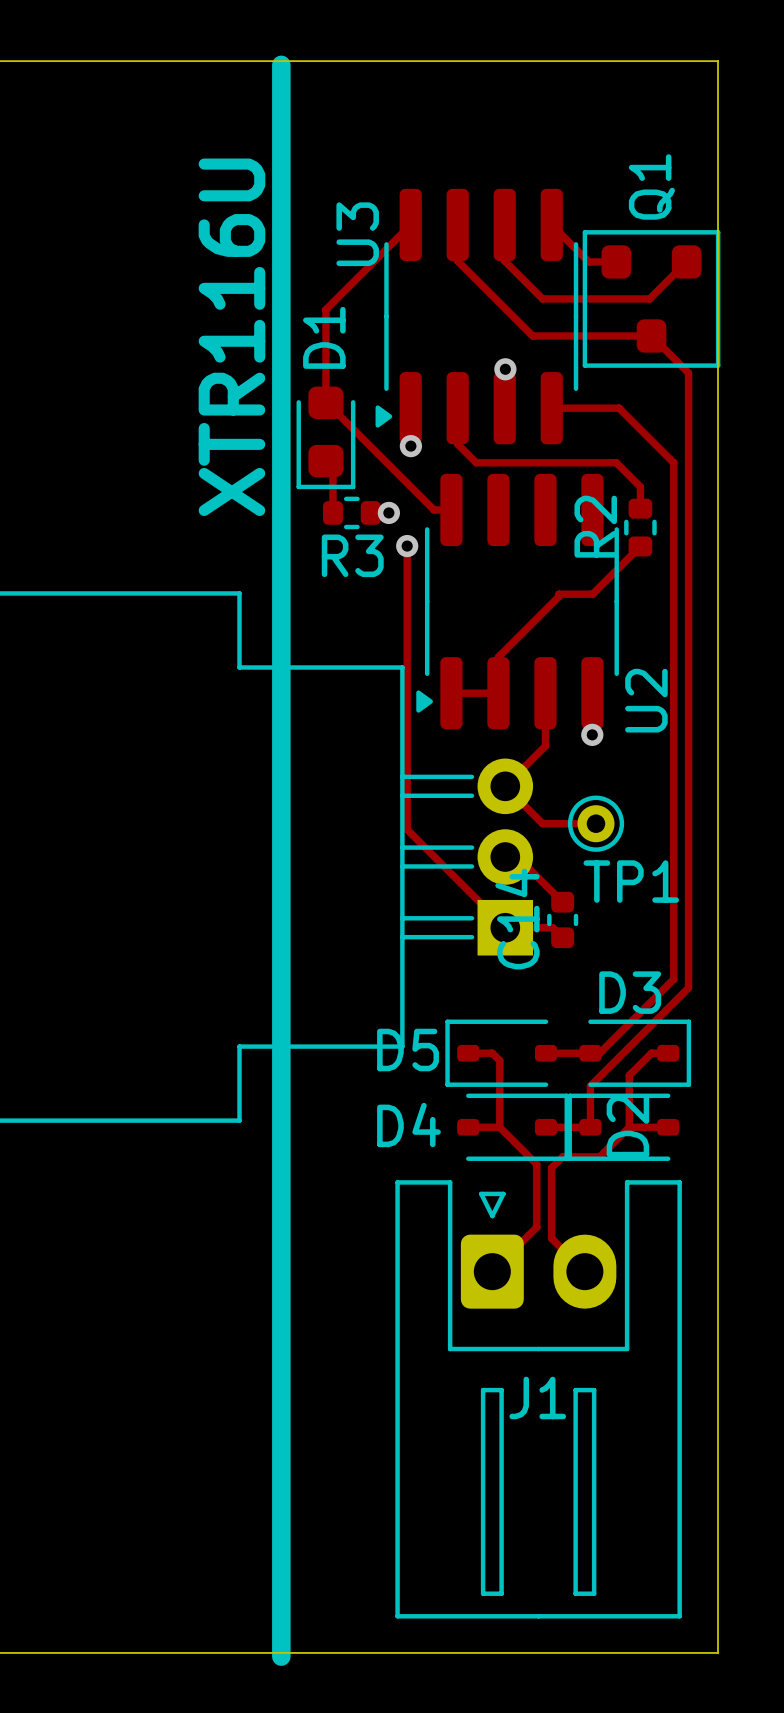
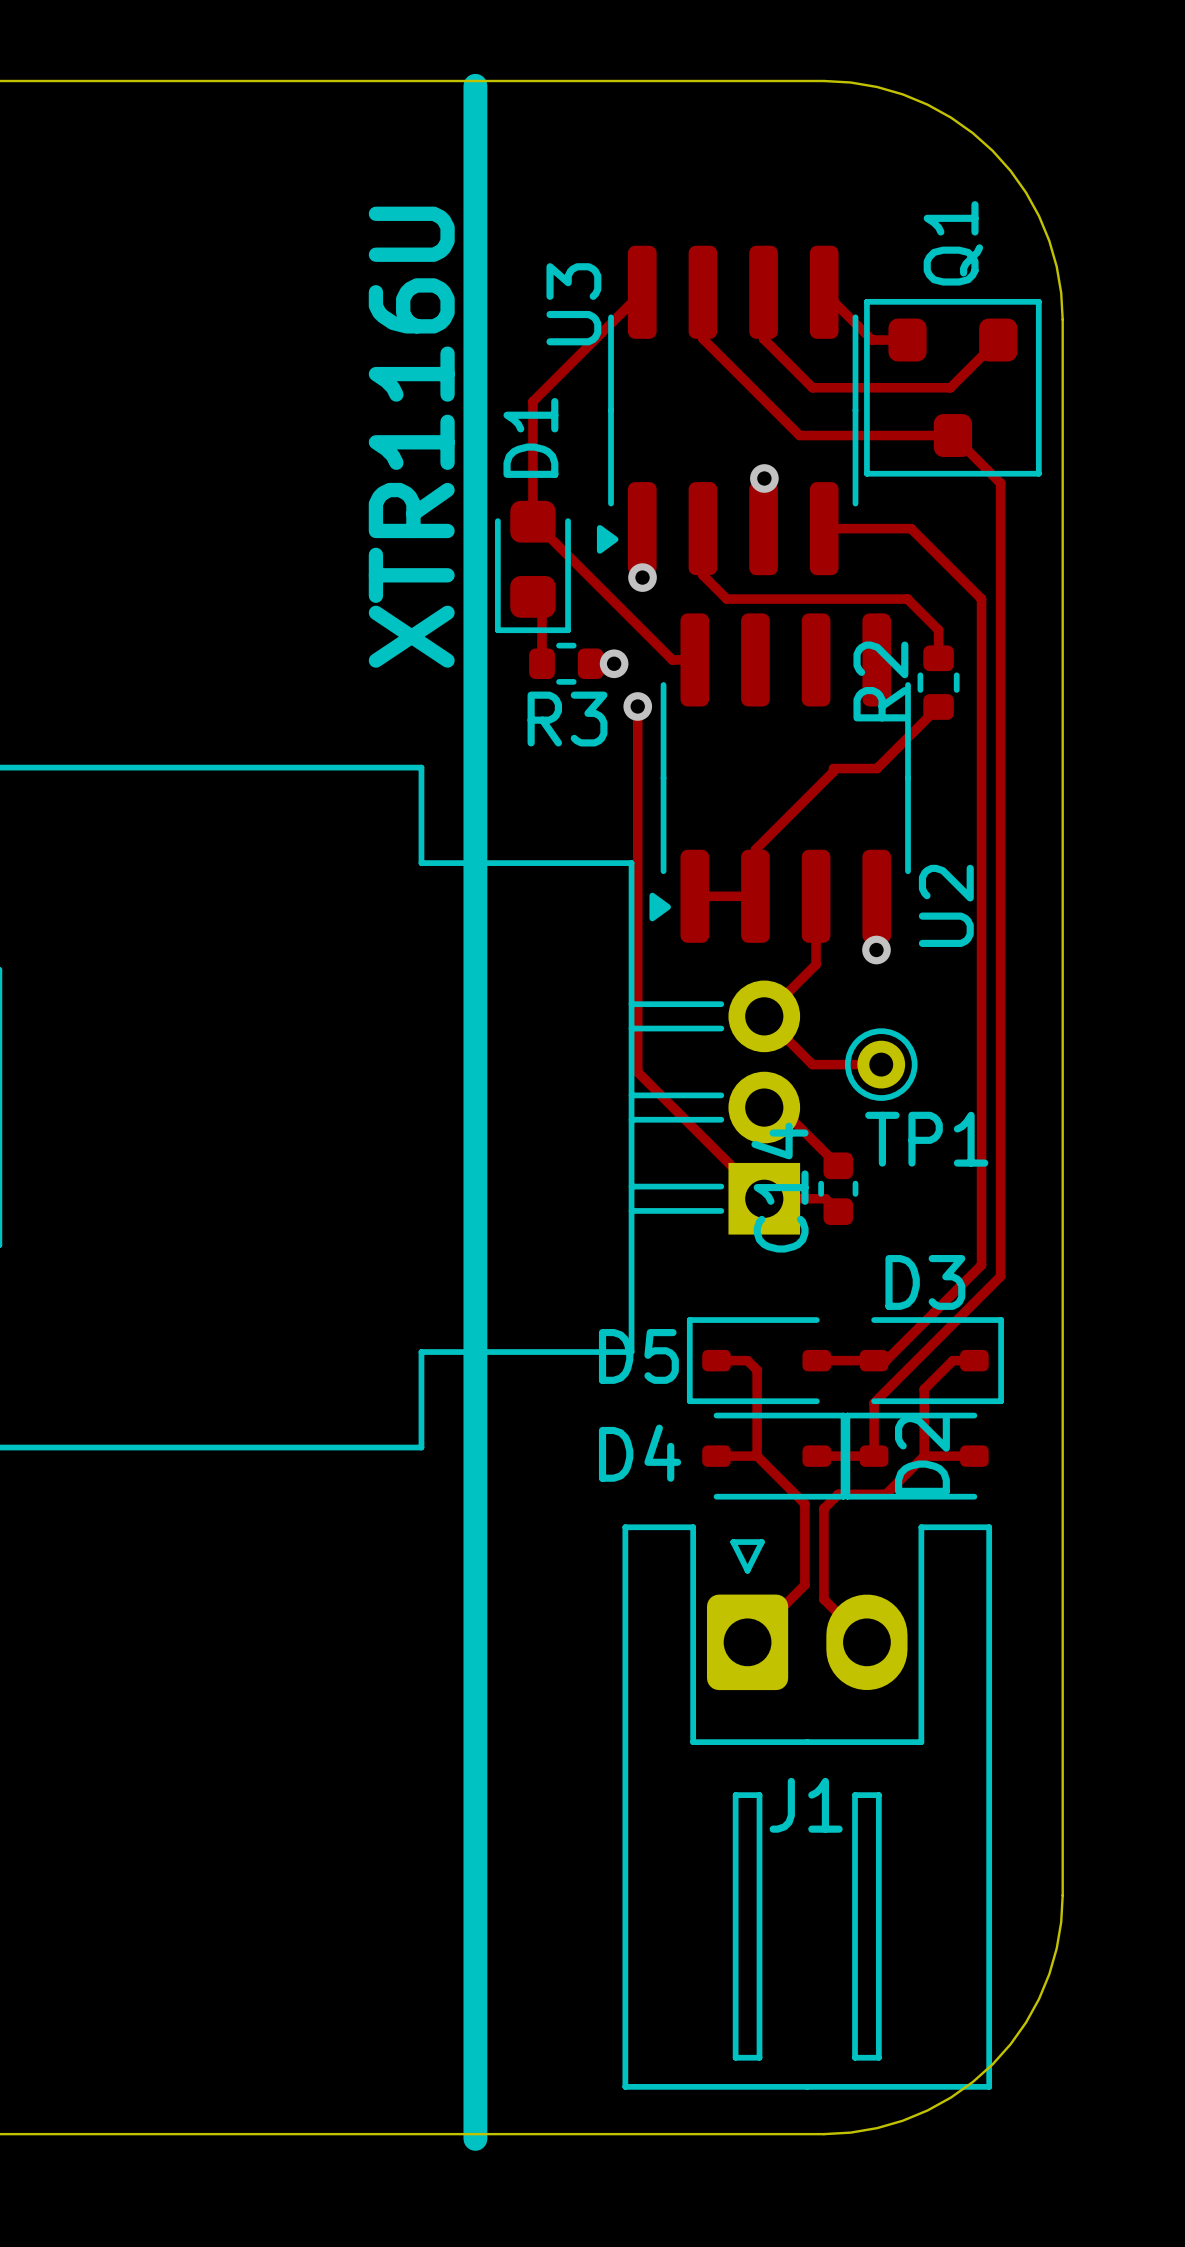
board edge: (551, 61) (717, 61) (717, 1652) (551, 1652) -> (823, 81) (850, 82) (877, 86) (902, 94) (927, 104) (950, 117) (972, 133) (992, 150) (1010, 170) (1026, 192) (1039, 216) (1049, 240) (1056, 266) (1061, 293) (1062, 319) (1061, 1922) (1056, 1948) (1049, 1974) (1039, 1998) (1026, 2022) (1010, 2044) (992, 2064) (972, 2082) (950, 2097) (927, 2110) (902, 2120) (877, 2128) (850, 2132) (823, 2134)

